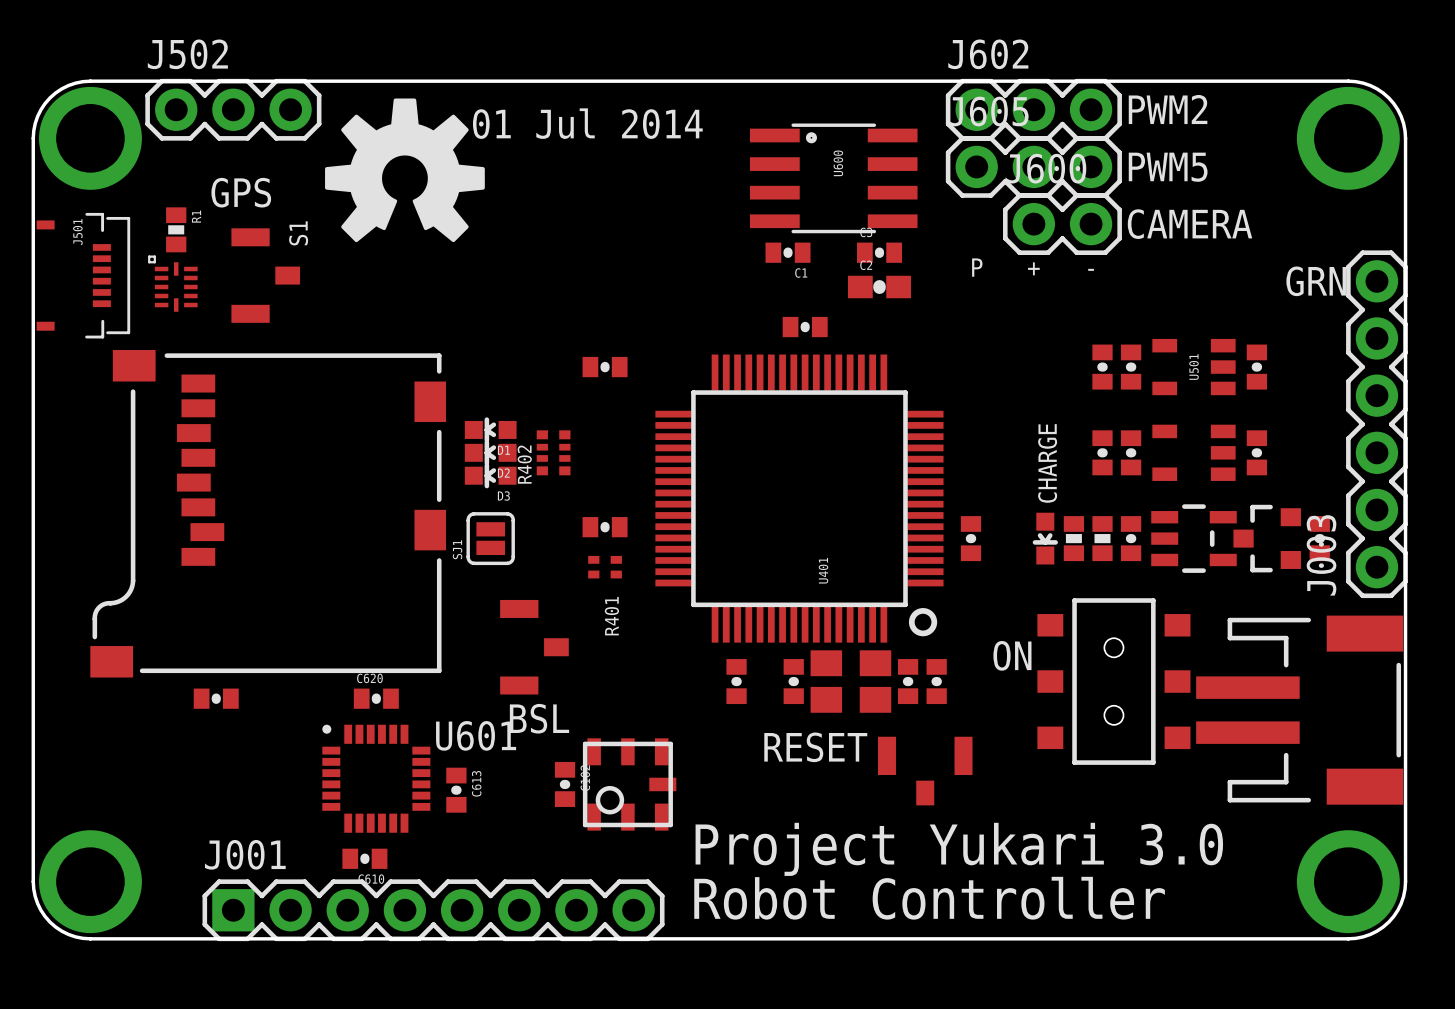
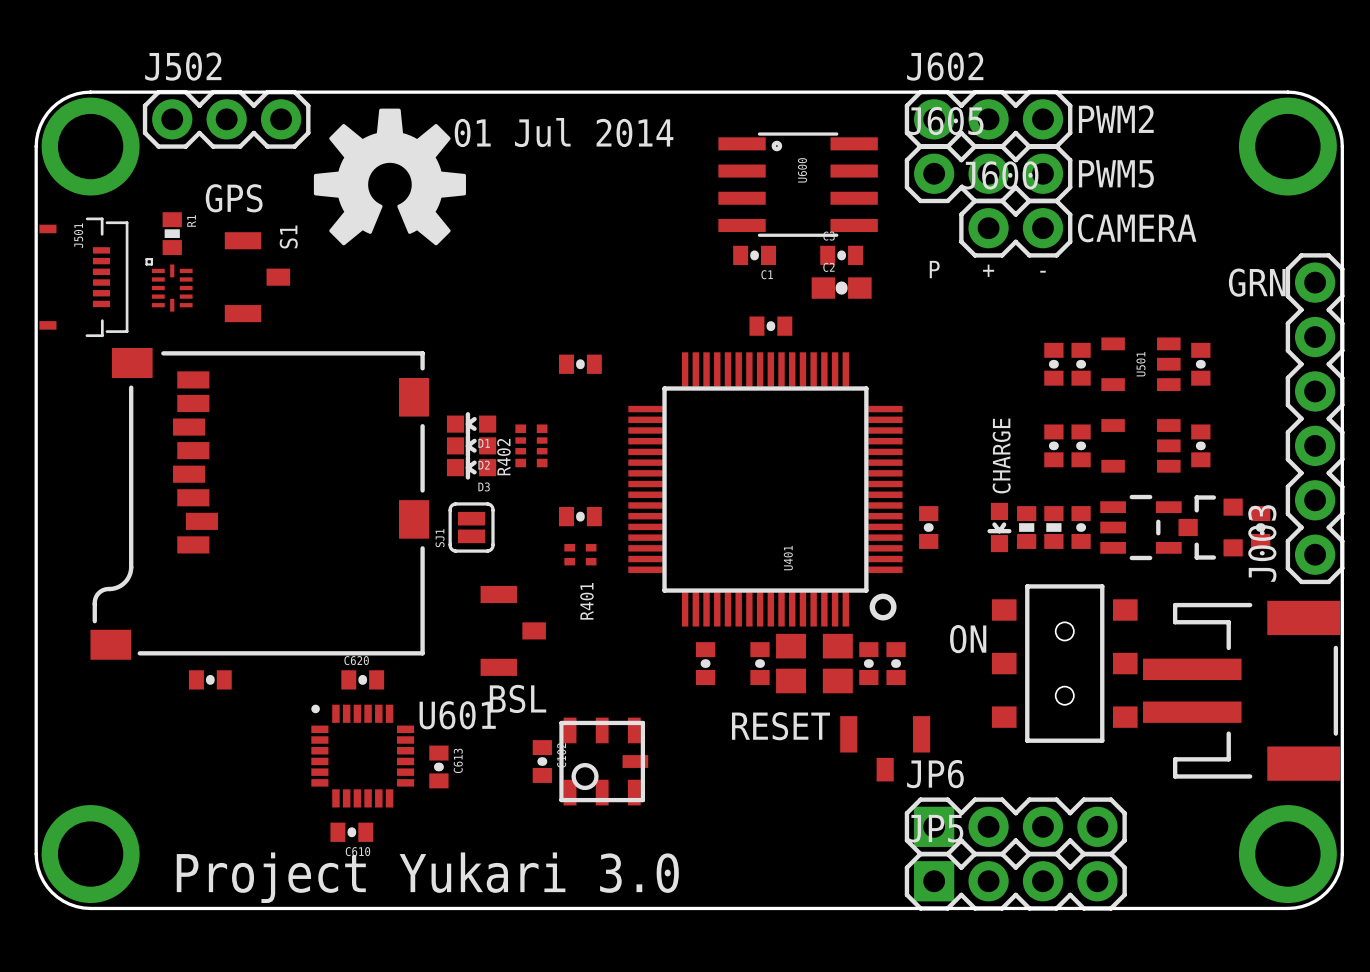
text position: Project Yukari 3.0 (959, 849) -> Project Yukari 3.0 (427, 877)
JP6: none -> (1015, 826)
text: Robot Controller (929, 898) -> none
J001: (433, 910) -> none
JP5: none -> (1015, 881)

